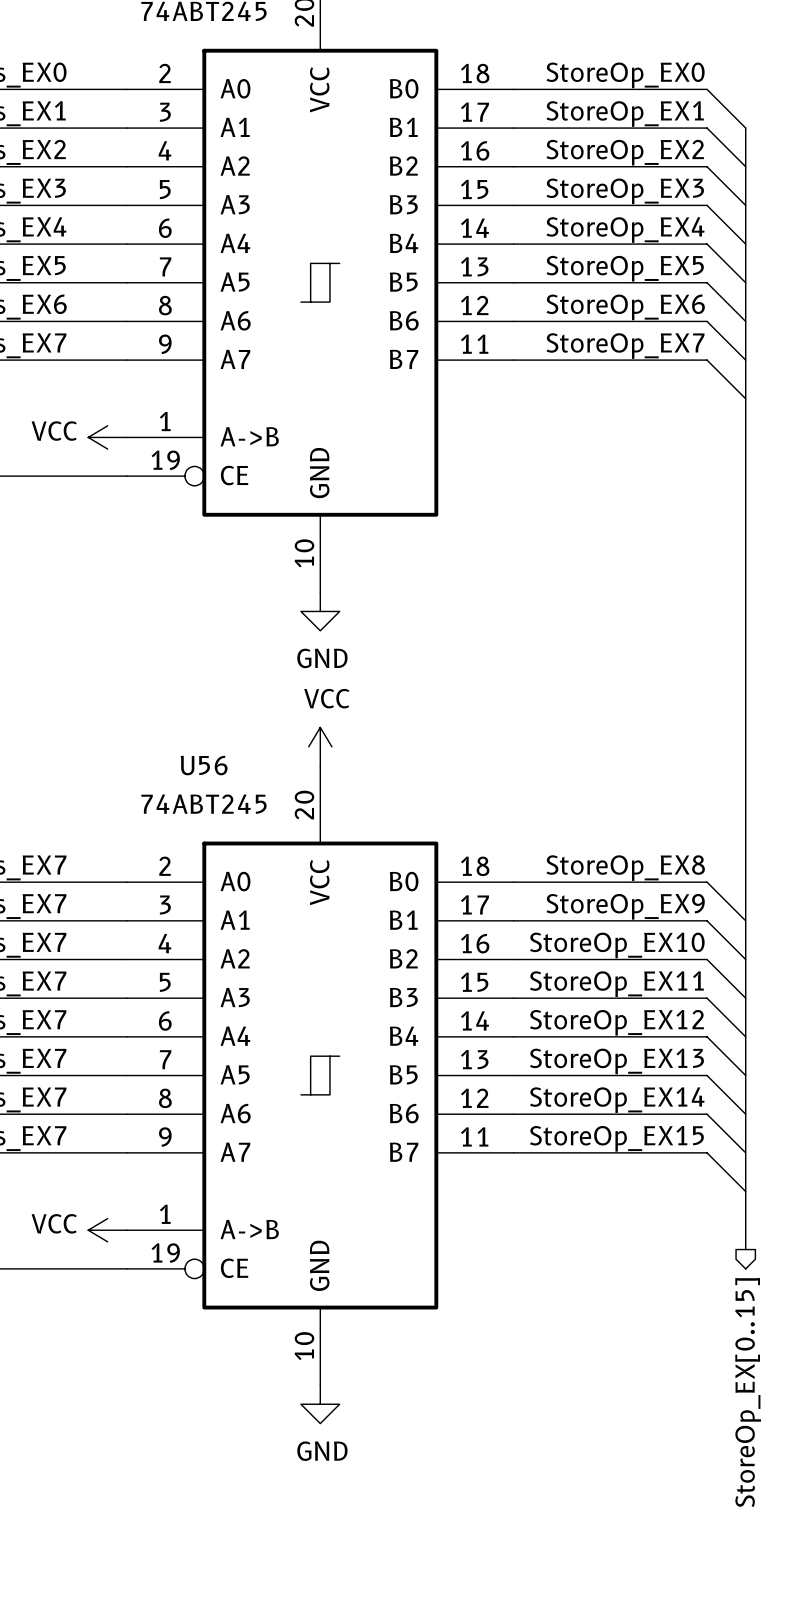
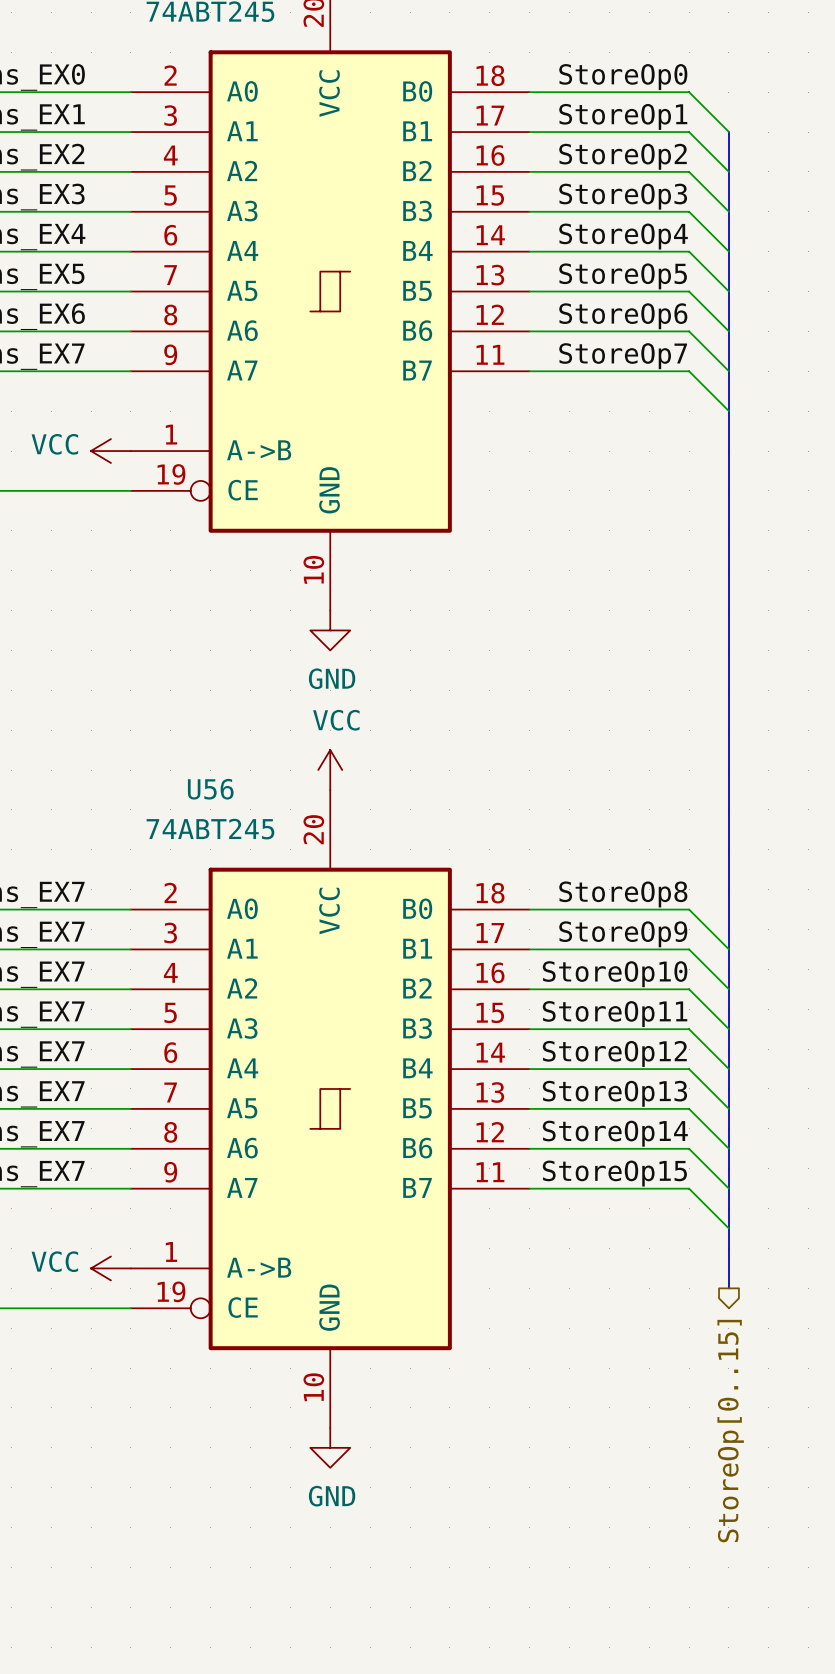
label: none -> StoreOp0 (623, 77)
label: StoreOp_EX0 (625, 75) -> none
wire: (668, 89) (707, 89) (745, 128) -> (689, 92) (728, 132)
label: none -> StoreOp1 (623, 116)
label: StoreOp_EX1 (625, 113) -> none
wire: (668, 128) (707, 128) (745, 166) -> (689, 132) (728, 171)
bus: (745, 128) (745, 1249) -> (728, 132) (728, 1288)
label: none -> StoreOp2 (623, 156)
label: StoreOp_EX2 (625, 152) -> none
wire: (668, 166) (707, 166) (745, 205) -> (689, 171) (728, 211)
label: none -> StoreOp3 (623, 196)
label: StoreOp_EX3 (625, 191) -> none
wire: (668, 205) (707, 205) (745, 244) -> (689, 211) (728, 251)
label: none -> StoreOp4 (623, 236)
label: StoreOp_EX4 (625, 230) -> none
wire: (668, 244) (707, 244) (745, 282) -> (689, 251) (728, 291)
label: none -> StoreOp5 (623, 276)
label: StoreOp_EX5 (625, 268) -> none
wire: (668, 282) (707, 282) (745, 321) -> (689, 291) (728, 331)
label: none -> StoreOp6 (623, 316)
label: StoreOp_EX6 (625, 307) -> none
wire: (668, 321) (707, 321) (745, 360) -> (689, 331) (728, 371)
label: none -> StoreOp7 (623, 356)
label: StoreOp_EX7 (625, 346) -> none
wire: (668, 360) (707, 360) (745, 398) -> (689, 371) (728, 411)
label: none -> StoreOp8 (623, 894)
label: StoreOp_EX8 (625, 868) -> none
wire: (668, 882) (707, 882) (745, 920) -> (689, 909) (728, 949)
label: none -> StoreOp9 (623, 934)
label: StoreOp_EX9 (625, 906) -> none
wire: (668, 920) (707, 920) (745, 959) -> (689, 949) (728, 989)
label: none -> StoreOp10 (615, 974)
label: StoreOp_EX10 (617, 945) -> none
wire: (668, 959) (707, 959) (745, 998) -> (689, 989) (728, 1029)
label: none -> StoreOp11 (615, 1014)
label: StoreOp_EX11 (616, 984) -> none
wire: (668, 998) (707, 998) (745, 1036) -> (689, 1029) (728, 1069)
label: none -> StoreOp12 (614, 1053)
label: StoreOp_EX12 (616, 1022) -> none
wire: (668, 1036) (707, 1036) (745, 1075) -> (689, 1069) (728, 1108)
label: none -> StoreOp13 (614, 1093)
label: StoreOp_EX13 (616, 1061) -> none
wire: (668, 1075) (707, 1075) (745, 1114) -> (689, 1108) (728, 1148)
label: none -> StoreOp14 (615, 1133)
label: StoreOp_EX14 (617, 1100) -> none
wire: (668, 1114) (707, 1114) (745, 1152) -> (689, 1148) (728, 1188)
label: none -> StoreOp15 (614, 1173)
label: StoreOp_EX15 (616, 1138) -> none
wire: (668, 1152) (707, 1152) (745, 1191) -> (689, 1188) (728, 1228)
hierarchical label: StoreOp_EX[0..15] (748, 1392) -> StoreOp[0..15] (730, 1431)

